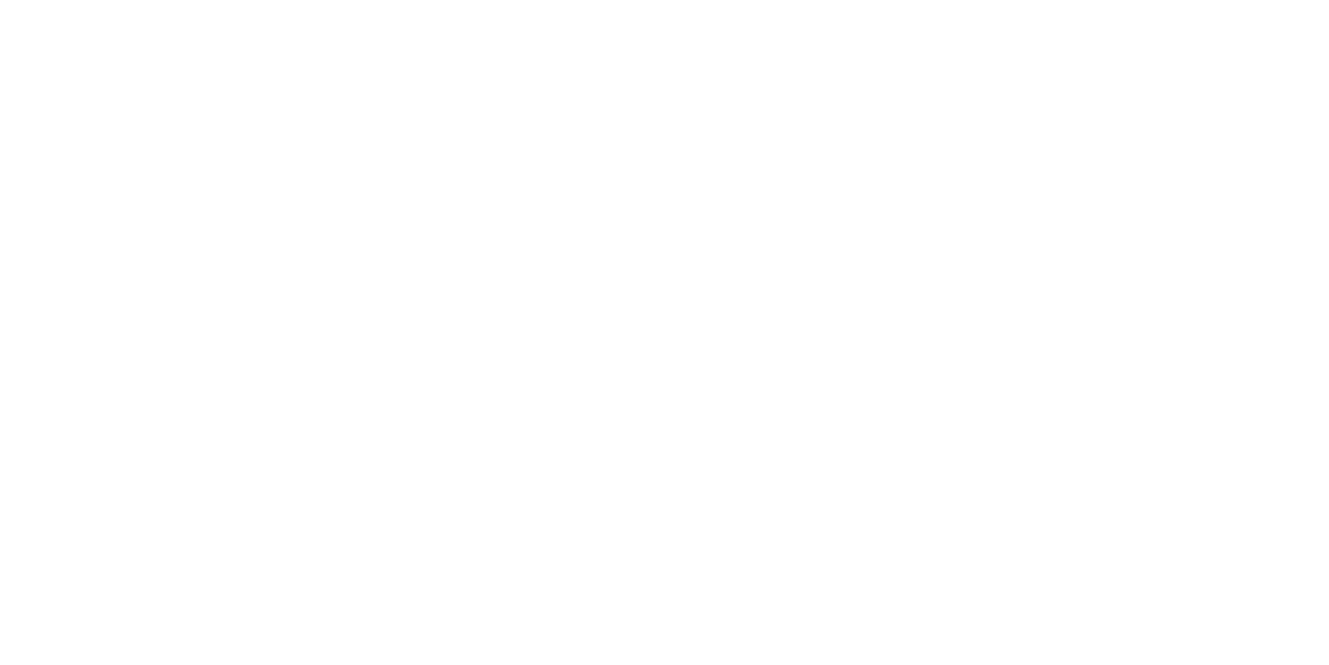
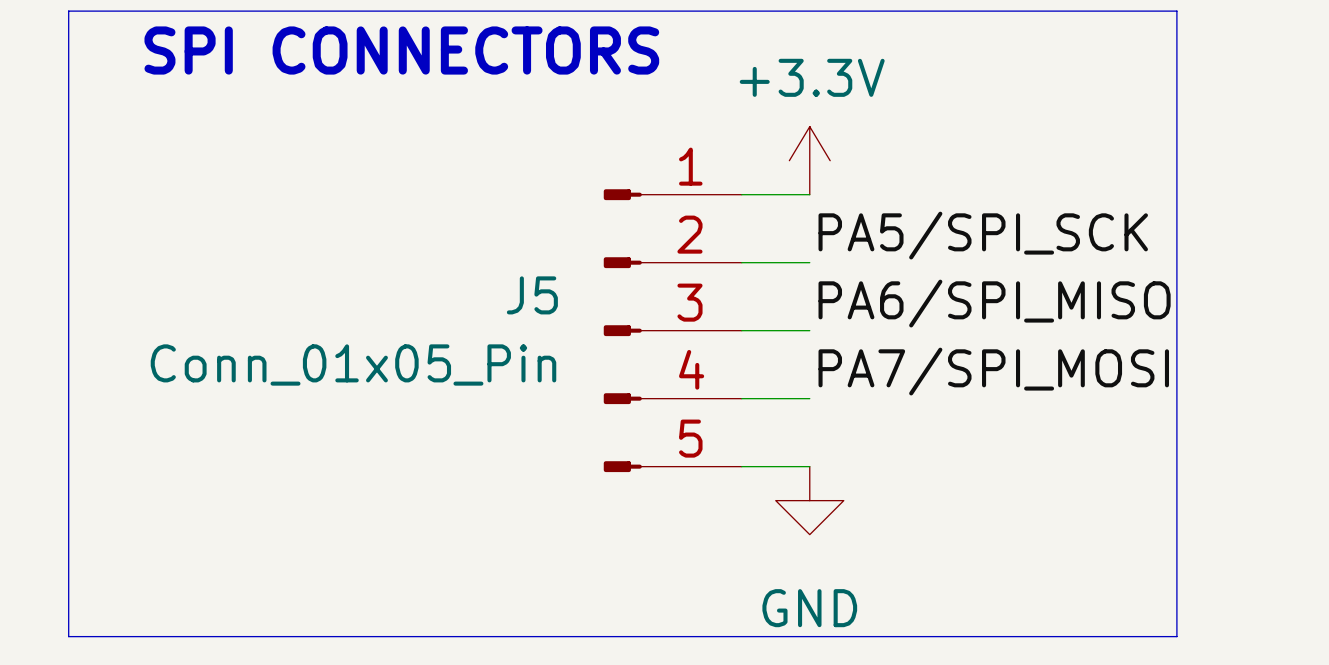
line: none -> (68, 11) (1176, 11) (1176, 636) (68, 636) (68, 11)
text: none -> SPI CONNECTORS (401, 50)
power symbol: none -> +3.3V (809, 160)
wire: none -> (741, 194) (809, 194)
label: none -> PA5/SPI_SCK (983, 235)
wire: none -> (741, 262) (809, 262)
label: none -> PA6/SPI_MISO (994, 303)
J5: none -> Conn_01x05_Pin (672, 330)
wire: none -> (741, 330) (809, 330)
label: none -> PA7/SPI_MOSI (993, 371)
wire: none -> (741, 398) (809, 398)
wire: none -> (741, 466) (809, 466)
power symbol: none -> GND (809, 500)

